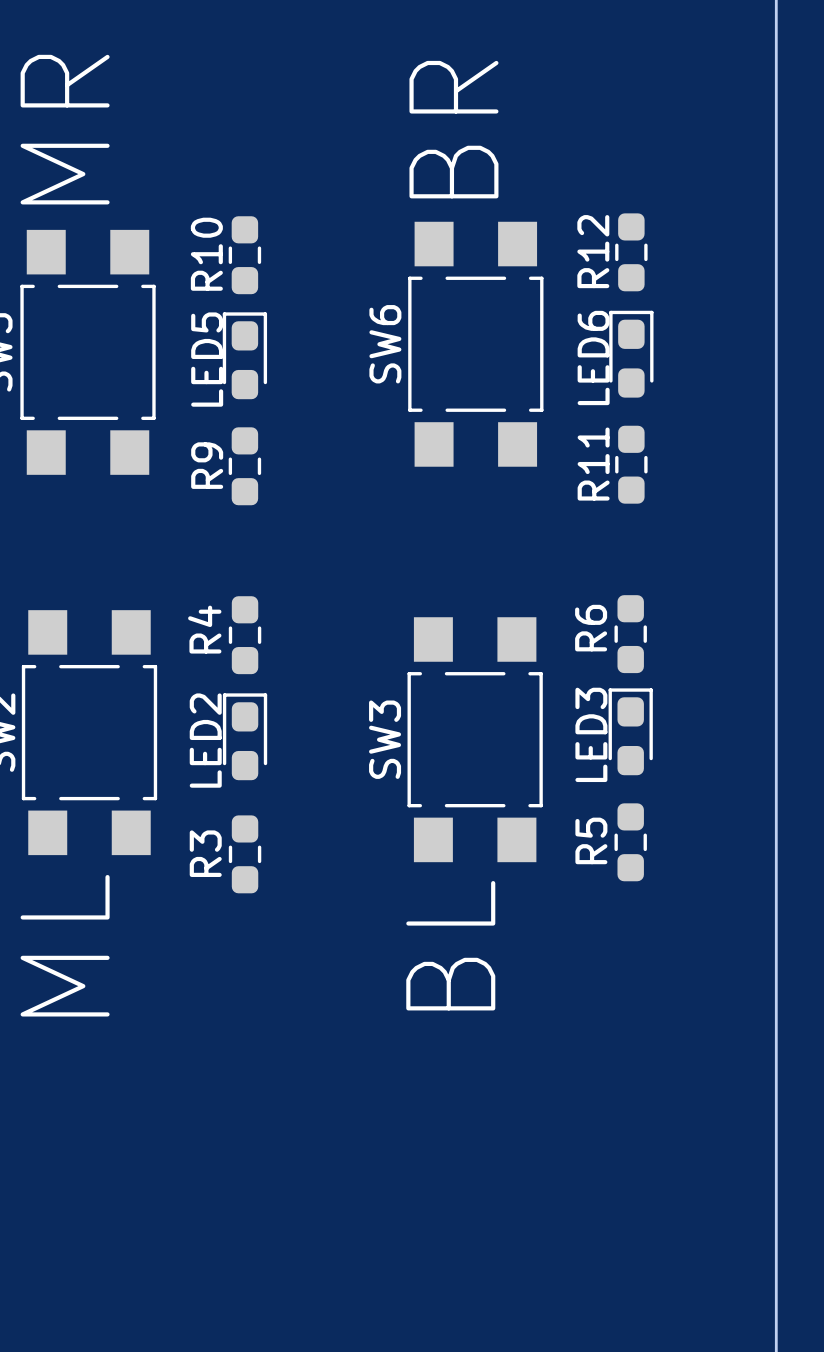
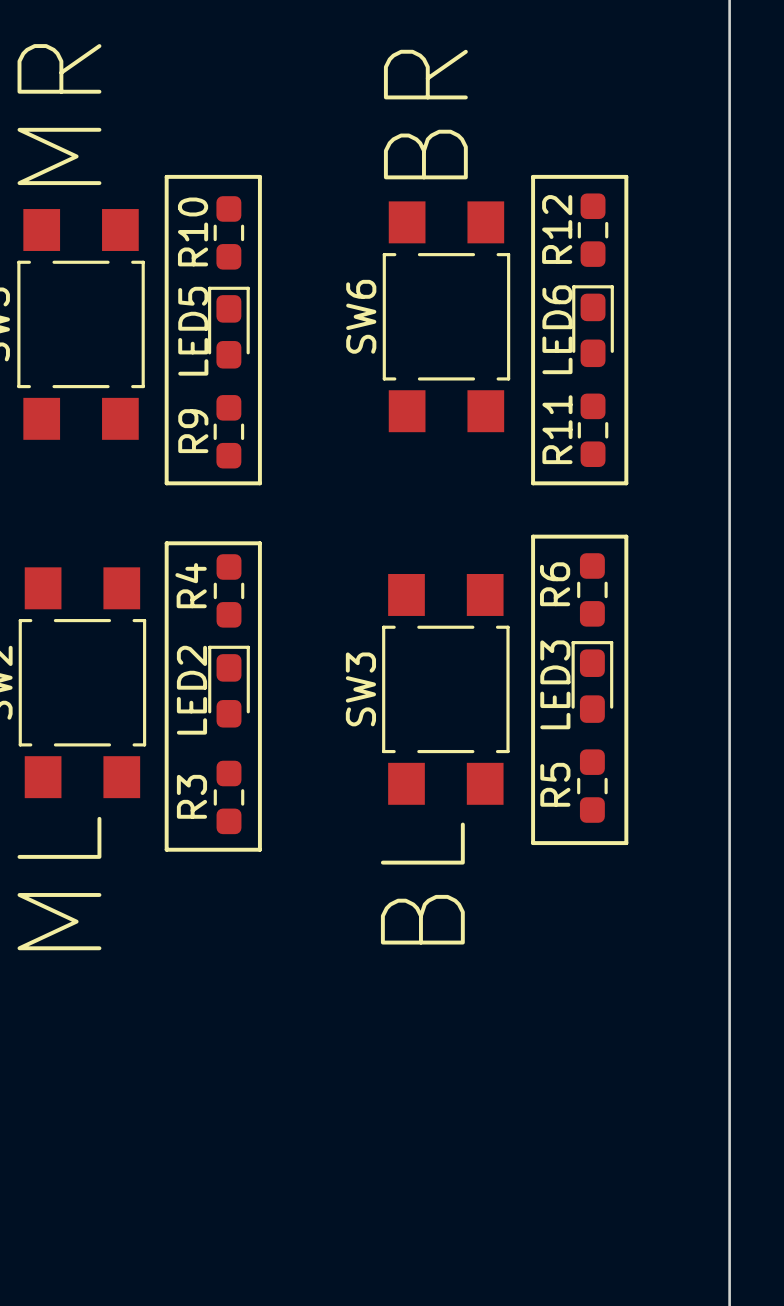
line: none -> (166, 176) (259, 176) (259, 483) (166, 483) (166, 176)
line: none -> (533, 176) (533, 483) (626, 483) (626, 176) (533, 176)
line: none -> (533, 536) (533, 843) (626, 843) (626, 536) (533, 536)
line: none -> (166, 543) (166, 849) (259, 849) (259, 543) (166, 543)

